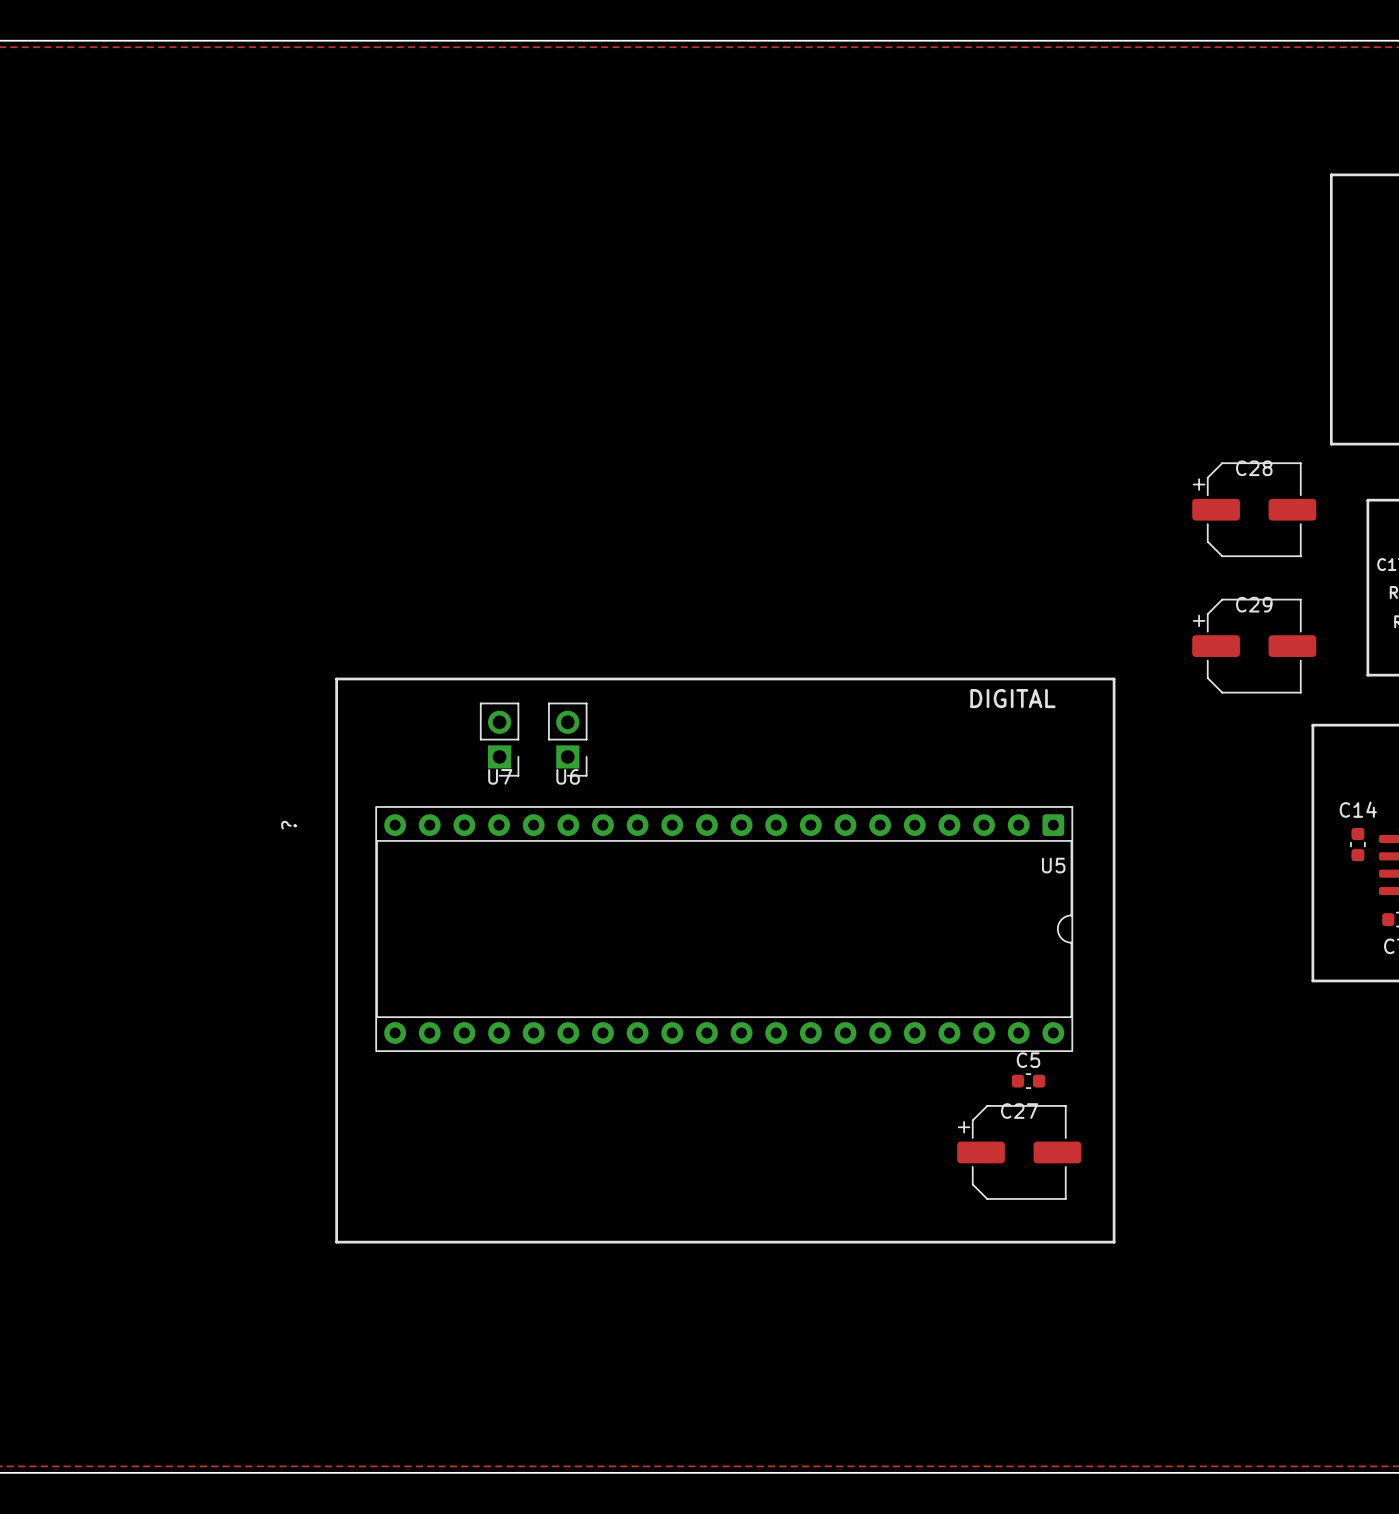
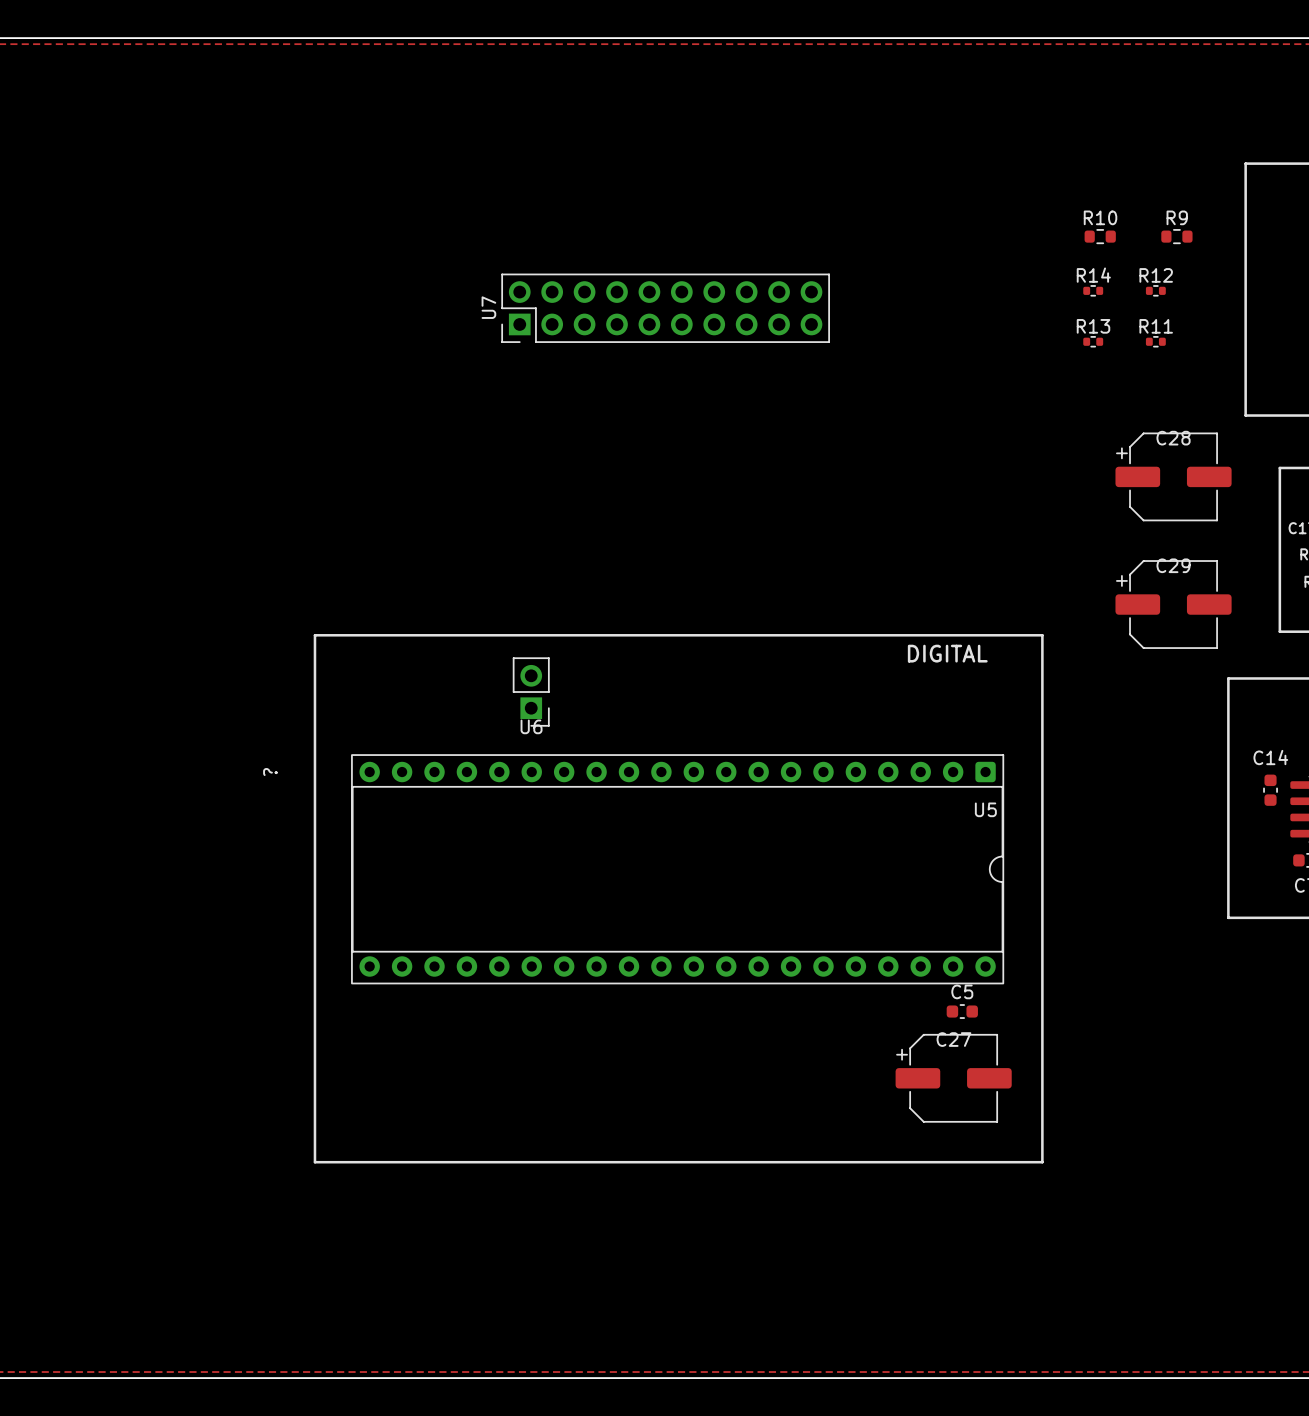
R10: none -> (1100, 236)
R9: none -> (1176, 236)
R14: none -> (1093, 290)
R12: none -> (1155, 290)
R13: none -> (1093, 341)
R11: none -> (1155, 341)
U7 footprint: [479, 702, 520, 777] -> [501, 273, 830, 343]
U7 name position: U7 (500, 776) -> U7 (488, 307)

